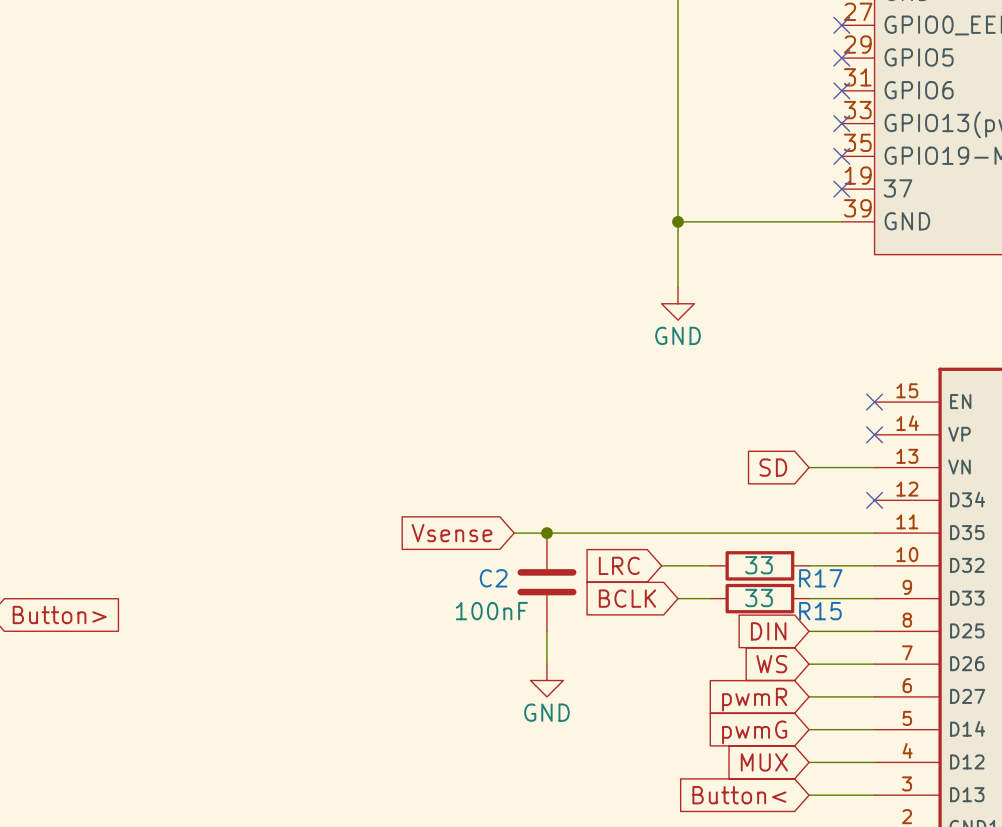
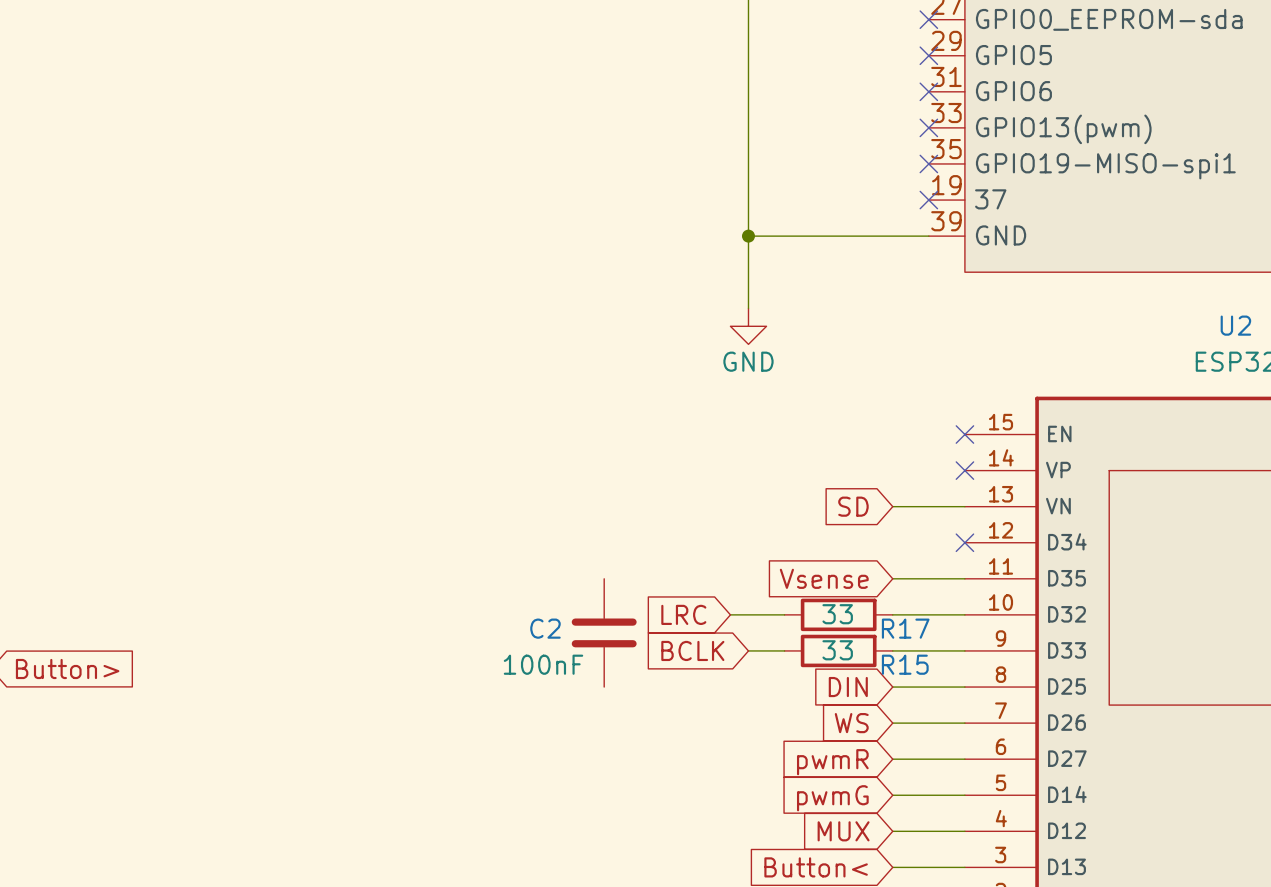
global label position: Vsense (451, 533) -> Vsense (824, 578)
wire: (514, 533) (809, 533) -> none
junction: (546, 533) -> none
wire: (546, 631) (546, 664) -> none
power symbol: GND (546, 680) -> none

